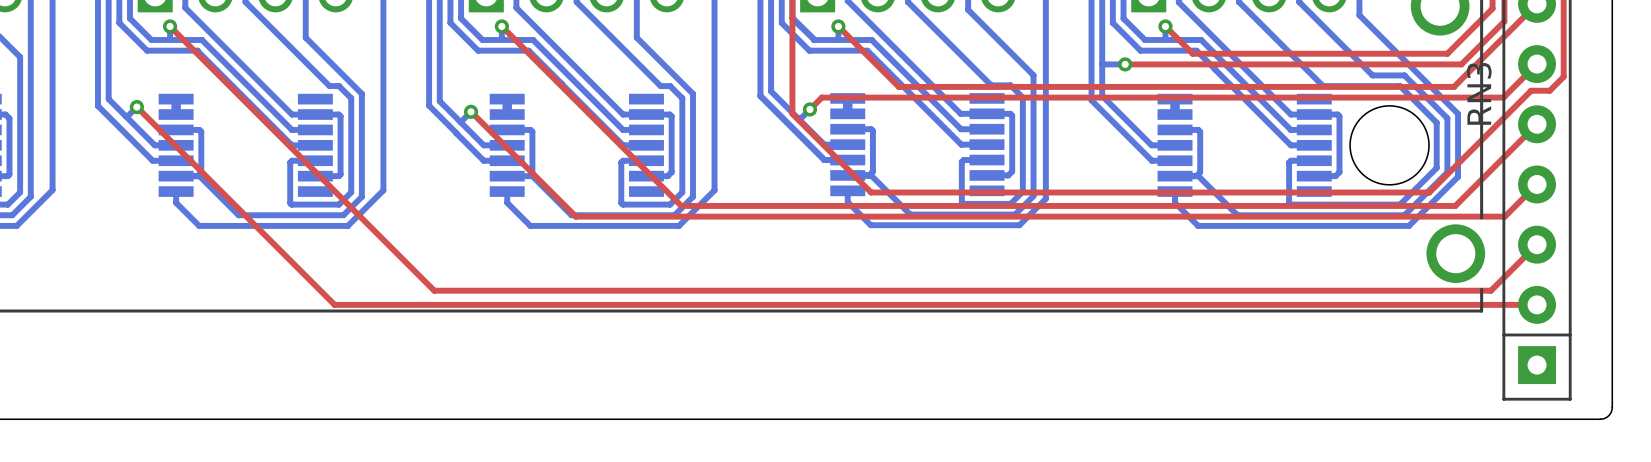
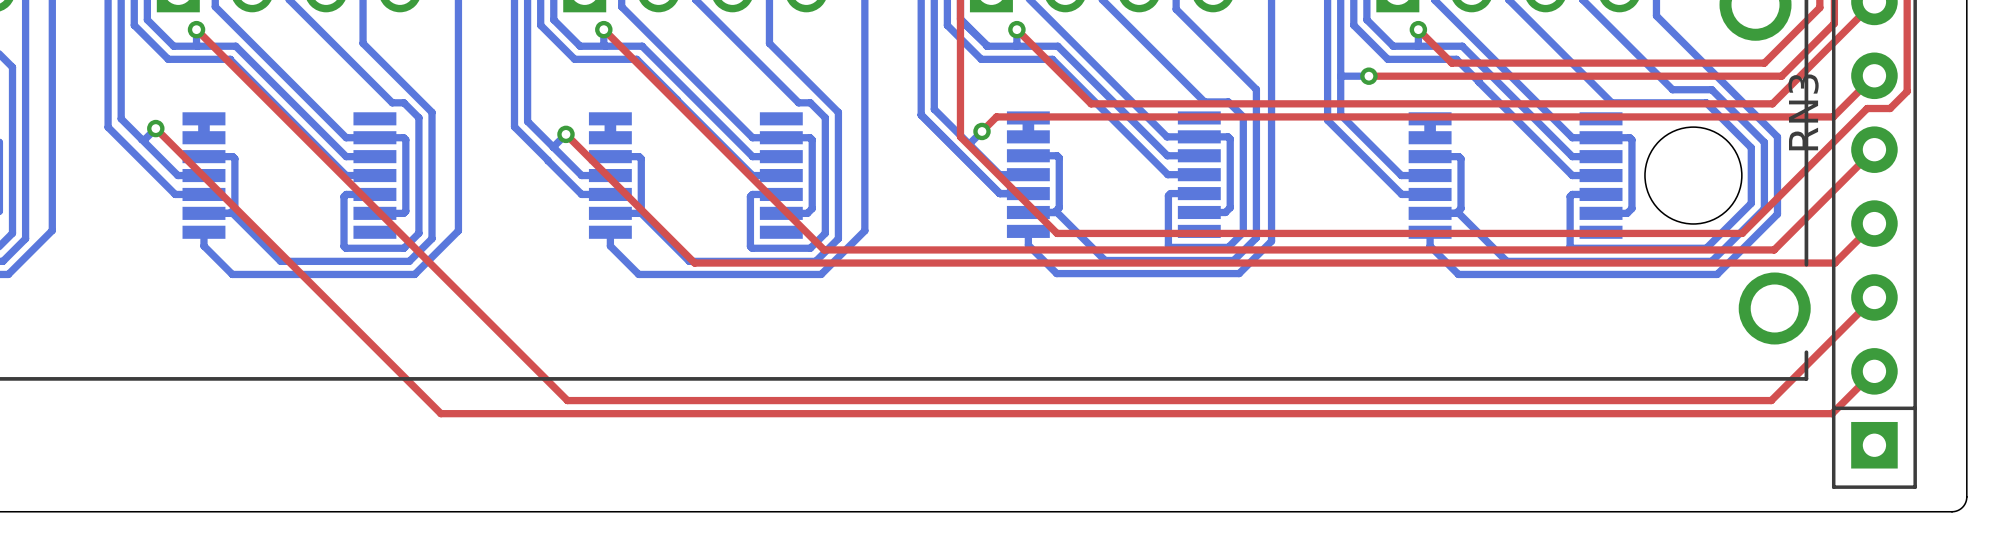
top track: (434, 290) (1491, 290) -> (520, 353) (567, 400) (1771, 400) (1817, 353)
top track: (334, 304) (1537, 304) -> (398, 371) (440, 413) (1832, 413) (1874, 371)

